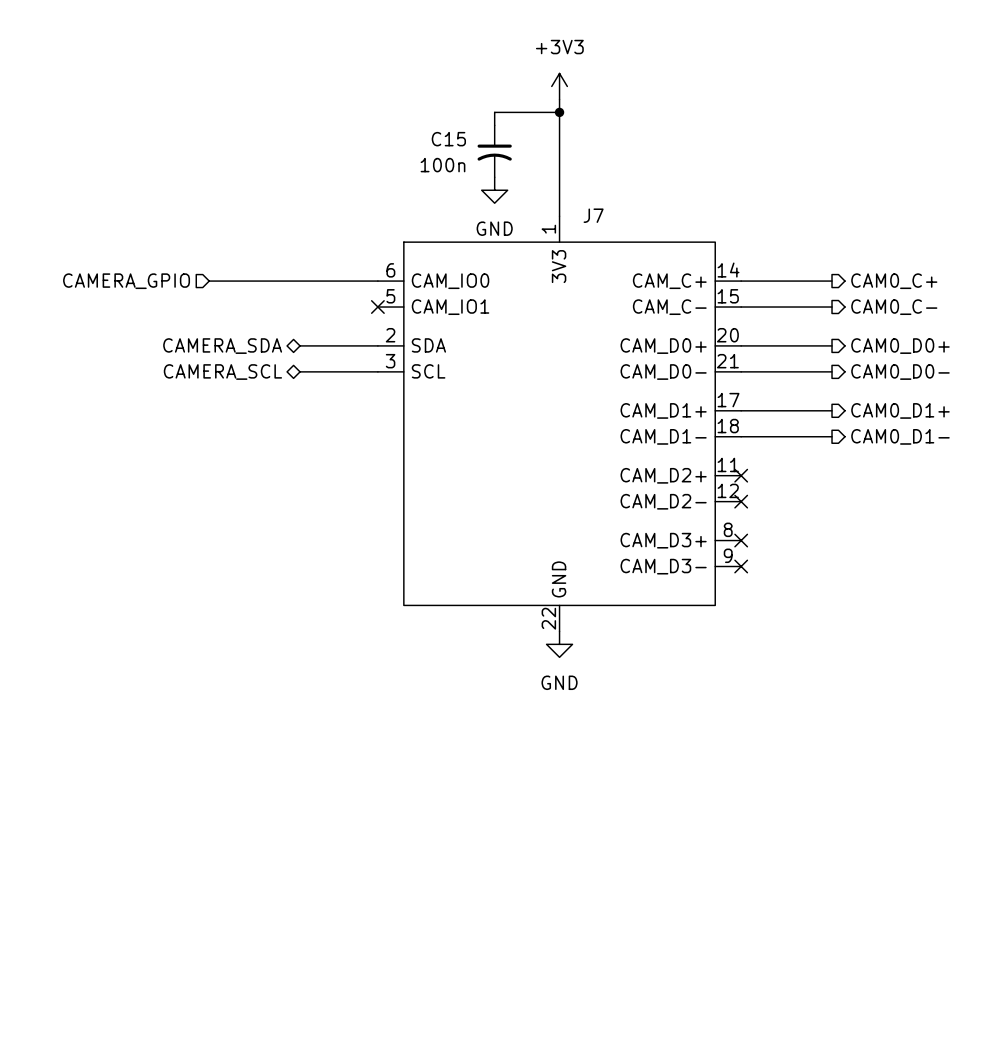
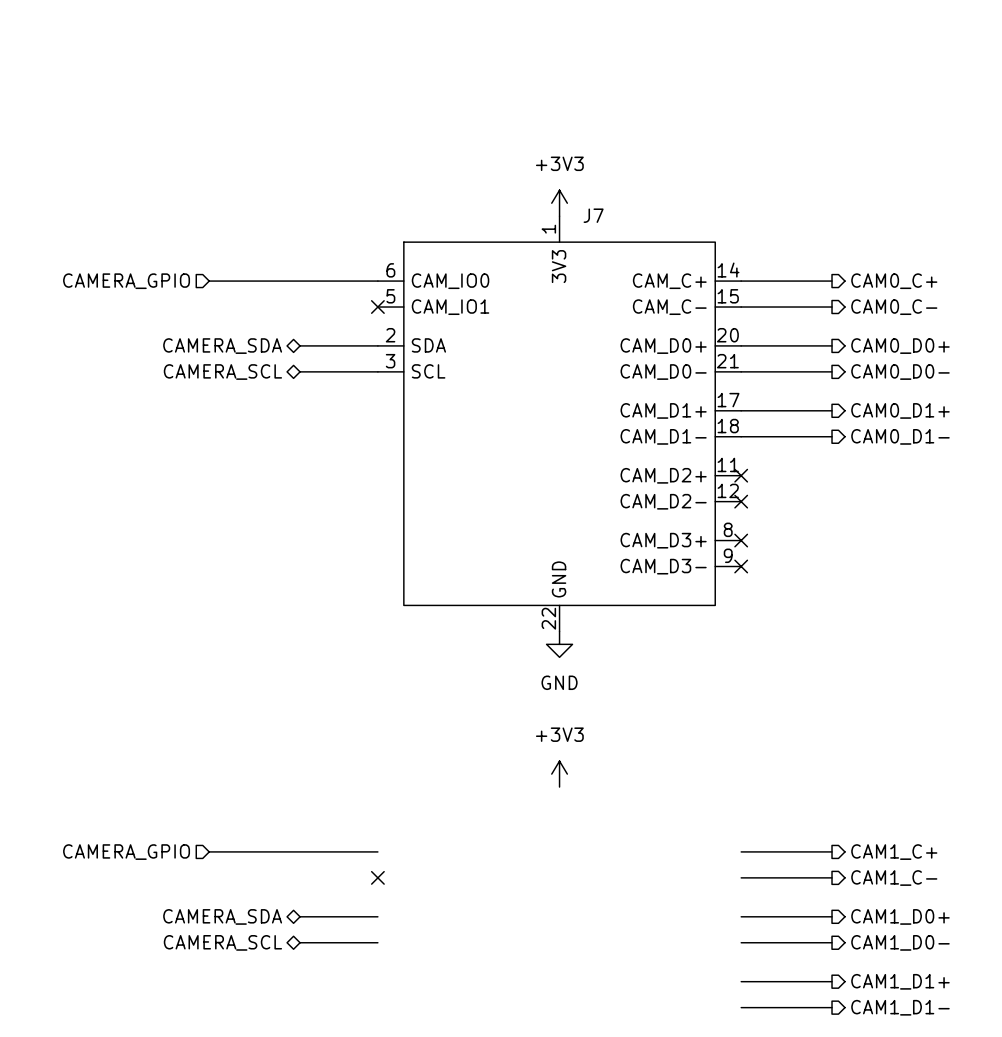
power symbol position: +3V3 (559, 86) -> +3V3 (559, 203)
wire: (559, 99) (559, 216) -> none
wire: (559, 112) (494, 112) (494, 125) -> none
junction: (559, 112) -> none
C15: 100n (494, 151) -> none
power symbol: GND (494, 190) -> none
power symbol: none -> +3V3 (559, 774)
wire: none -> (209, 851) (377, 851)
wire: none -> (741, 851) (832, 851)
hierarchical label: none -> CAMERA_GPIO (126, 852)
hierarchical label: none -> CAM1_C+ (894, 852)
no-connect mark: none -> (377, 877)
wire: none -> (741, 877) (832, 877)
hierarchical label: none -> CAM1_C- (894, 878)
hierarchical label: none -> CAMERA_SDA (222, 916)
wire: none -> (300, 916) (377, 916)
wire: none -> (741, 916) (832, 916)
hierarchical label: none -> CAM1_D0+ (900, 916)
hierarchical label: none -> CAMERA_SCL (222, 942)
wire: none -> (300, 942) (377, 942)
wire: none -> (741, 942) (832, 942)
hierarchical label: none -> CAM1_D0- (900, 942)
wire: none -> (741, 981) (832, 981)
hierarchical label: none -> CAM1_D1+ (900, 981)
wire: none -> (741, 1007) (832, 1007)
hierarchical label: none -> CAM1_D1- (900, 1007)

